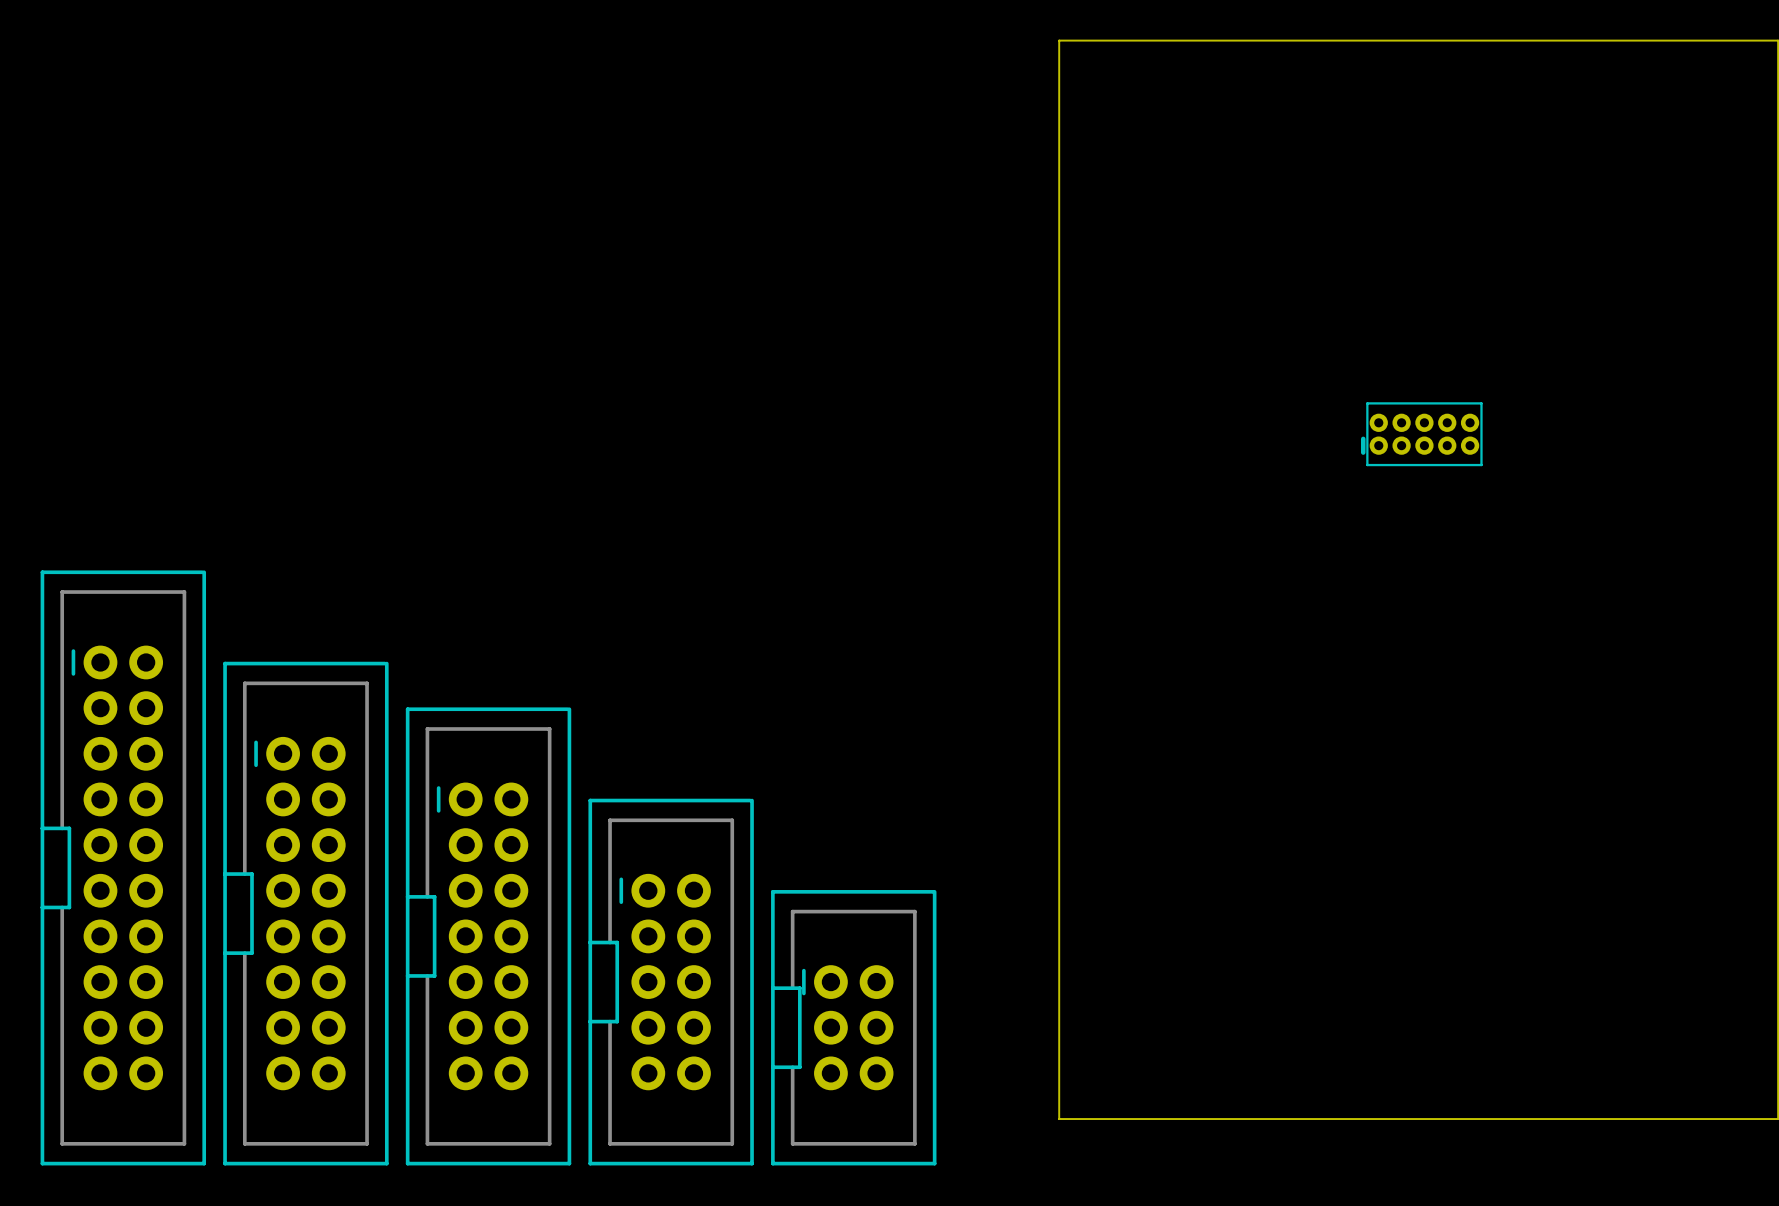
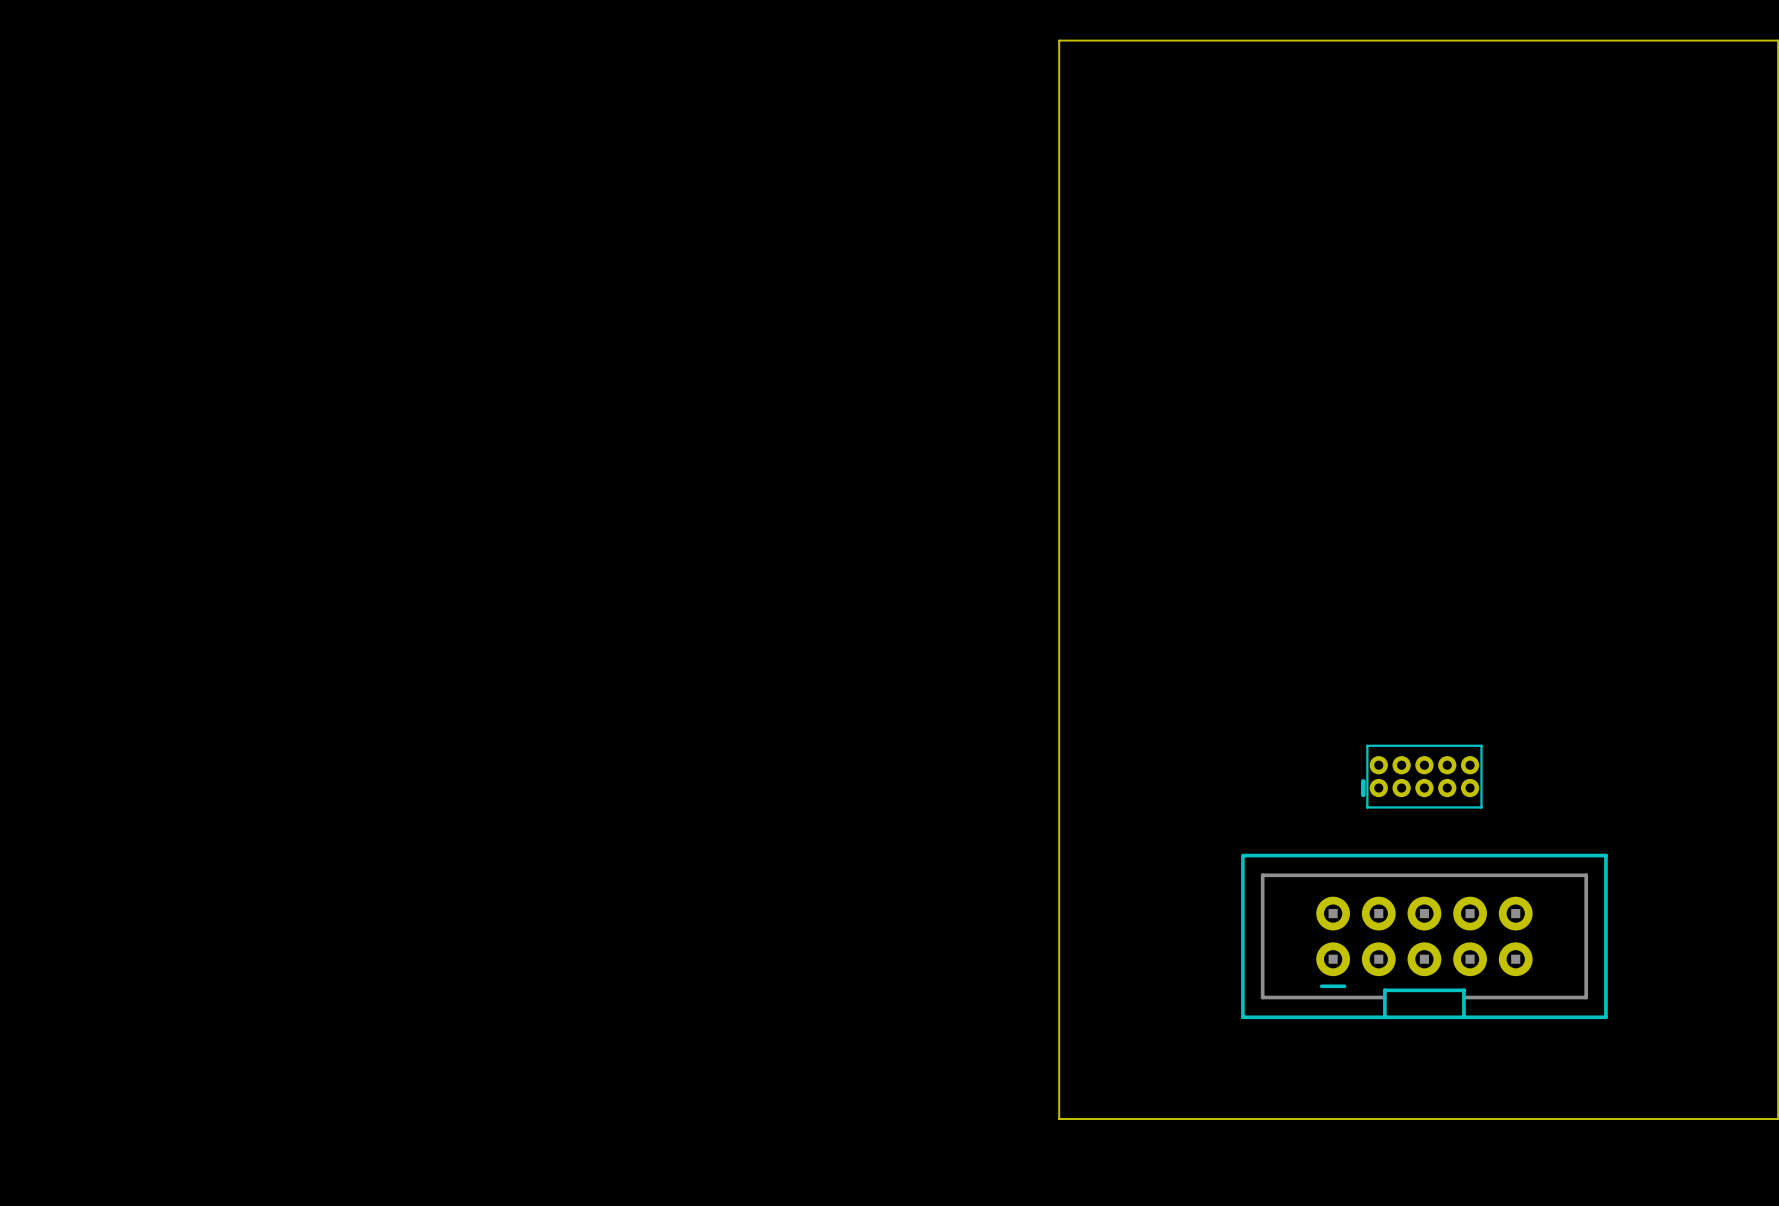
part position: (1421, 434) -> (1421, 776)
part: (123, 867) -> none
part: (305, 913) -> none
part: (488, 936) -> none
part: none -> (1424, 936)
part: (671, 982) -> none
part: (853, 1027) -> none

